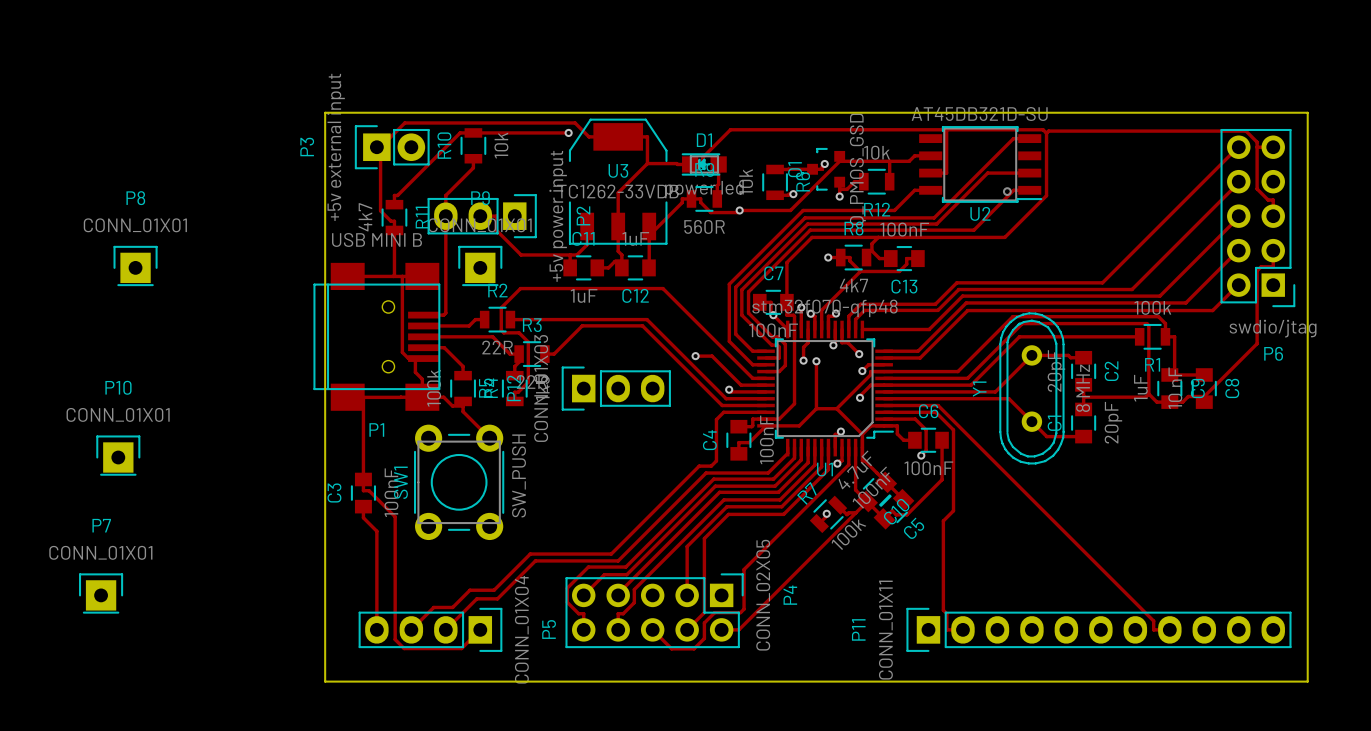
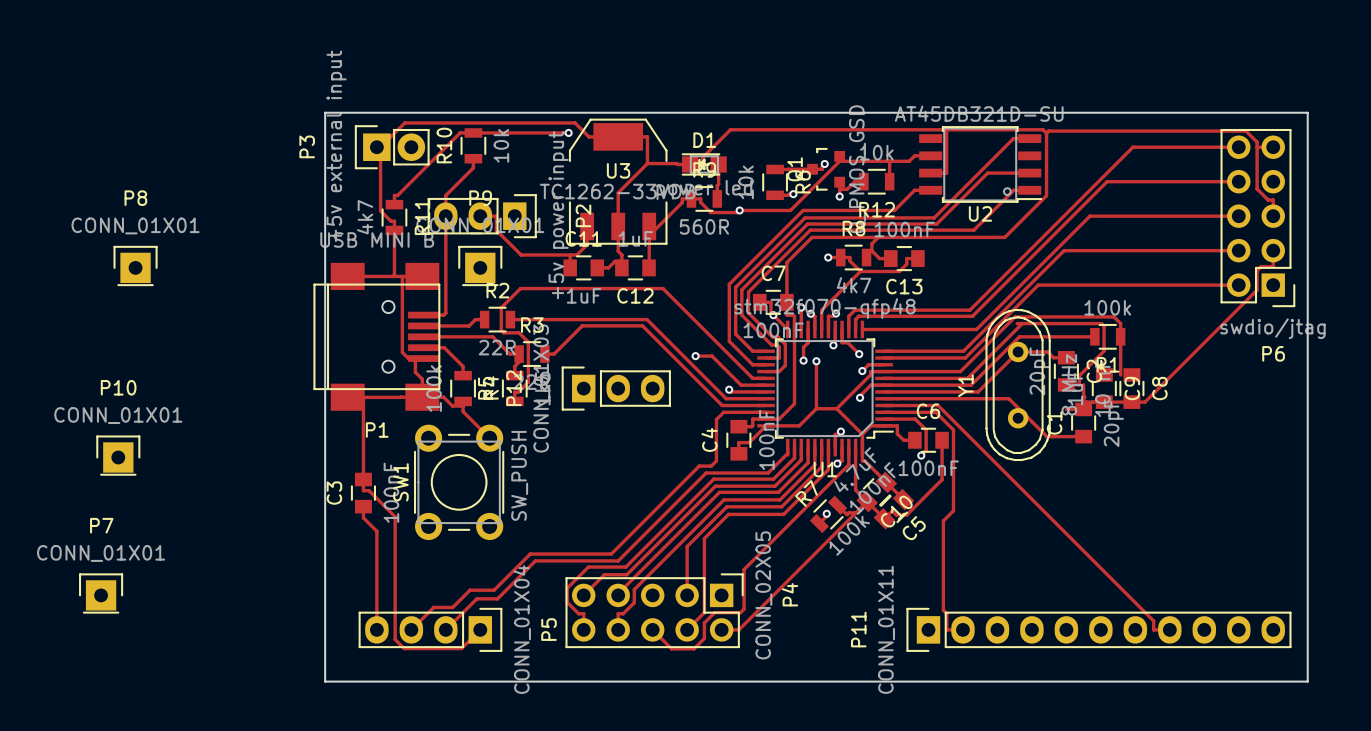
track: (1238, 147) (1102, 282) (956, 282) (935, 304) (860, 304) (854, 310) -> (1238, 147) (1132, 147) (969, 310) (854, 310)
track: (1239, 181) (1132, 289) (958, 289) (937, 310) (864, 310) (858, 316) -> (1238, 181) (1107, 181) (972, 316) (858, 316)
track: (1239, 216) (1159, 296) (962, 296) (929, 329) -> (1238, 216) (1089, 216) (976, 329) (929, 329)
track: (1238, 250) (1185, 302) (966, 302) (918, 351) -> (1238, 250) (1064, 250) (963, 351) (918, 351)
track: (1238, 285) (1212, 310) (967, 310) (920, 358) -> (1238, 285) (1038, 285) (965, 358) (920, 358)
track: (1257, 290) (1257, 343) (1204, 396) -> (1257, 290) (1145, 402) (1086, 402) (1079, 409) (1066, 409)
track: (1101, 323) (1146, 323) (1148, 325) (1148, 394) -> (1101, 323) (1104, 325) (1104, 351) (1079, 375) (1079, 384) (1066, 384)
track: (1094, 336) (1139, 336) -> none
R1 position: (1152, 336) -> (1107, 336)
track: (1083, 357) (1070, 357) (1068, 355) (1031, 355) (995, 391) (978, 391) -> (1066, 357) (1053, 357) (1047, 351) (1018, 351) (978, 391)
track: (957, 371) (1012, 316) (1158, 316) (1165, 323) (1165, 336) (1174, 336) (1174, 374) -> (957, 371) (960, 371) (1015, 316) (1113, 316) (1120, 323) (1120, 374)
C2 position: (1083, 371) -> (1066, 371)
track: (1169, 374) (1204, 374) -> none
Y1 position: (1031, 388) -> (1018, 384)
C9 position: (1169, 388) -> (1104, 388)
C8 position: (1204, 388) -> (1131, 388)
track: (1204, 396) (1188, 396) (1182, 402) (1156, 402) (1148, 394) (1145, 397) (1084, 397) -> none

